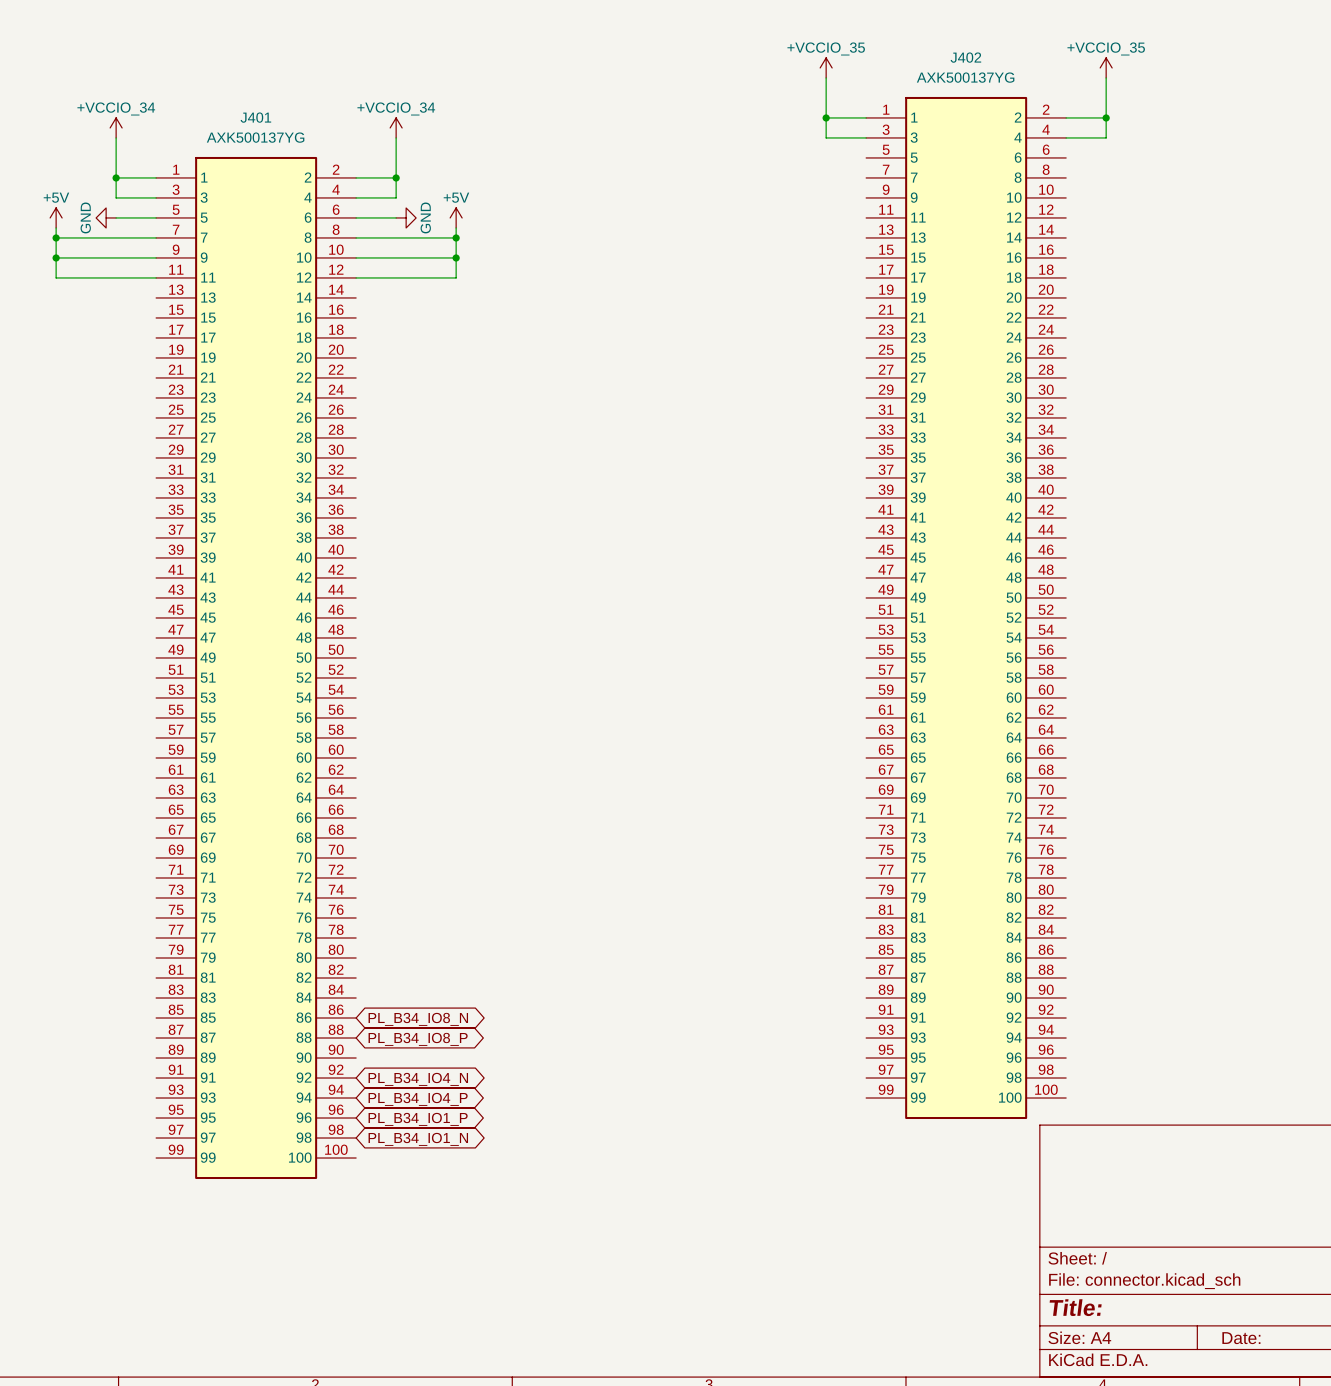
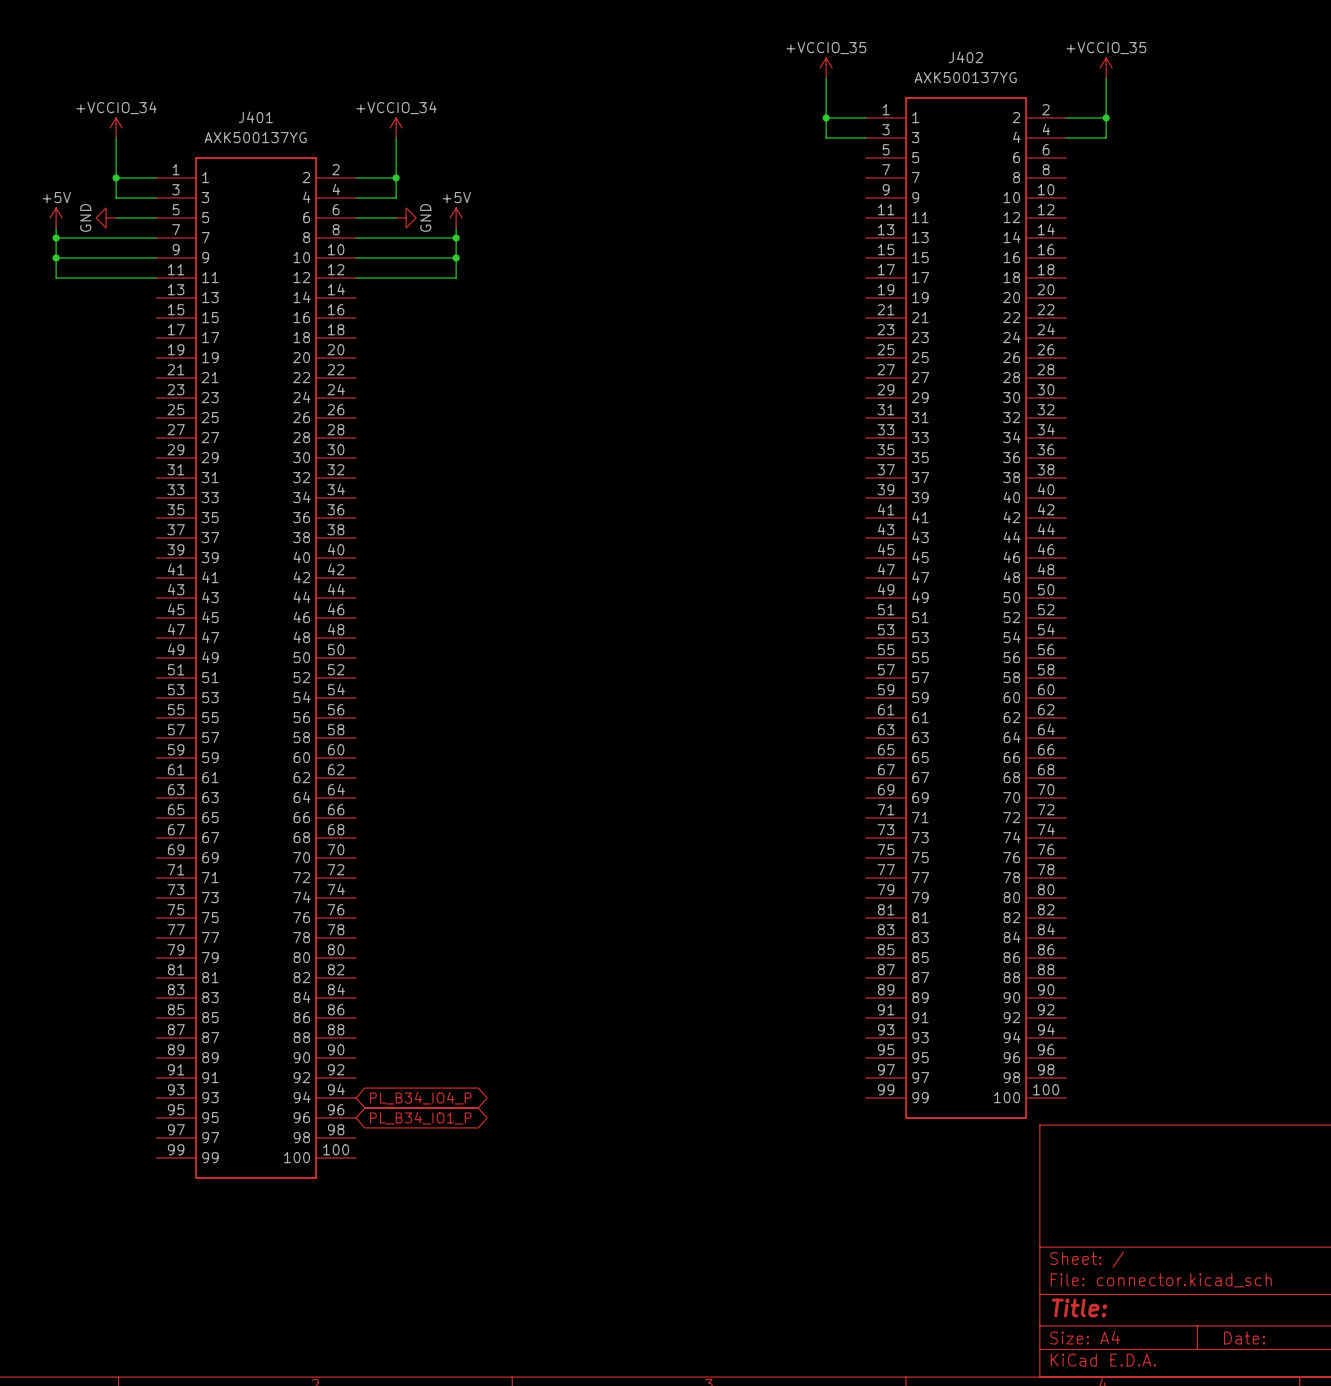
global label: PL_B34_IO8_N (418, 1019) -> none
global label: PL_B34_IO8_P (418, 1039) -> none
global label: PL_B34_IO4_N (418, 1079) -> none
global label: PL_B34_IO1_N (418, 1139) -> none

